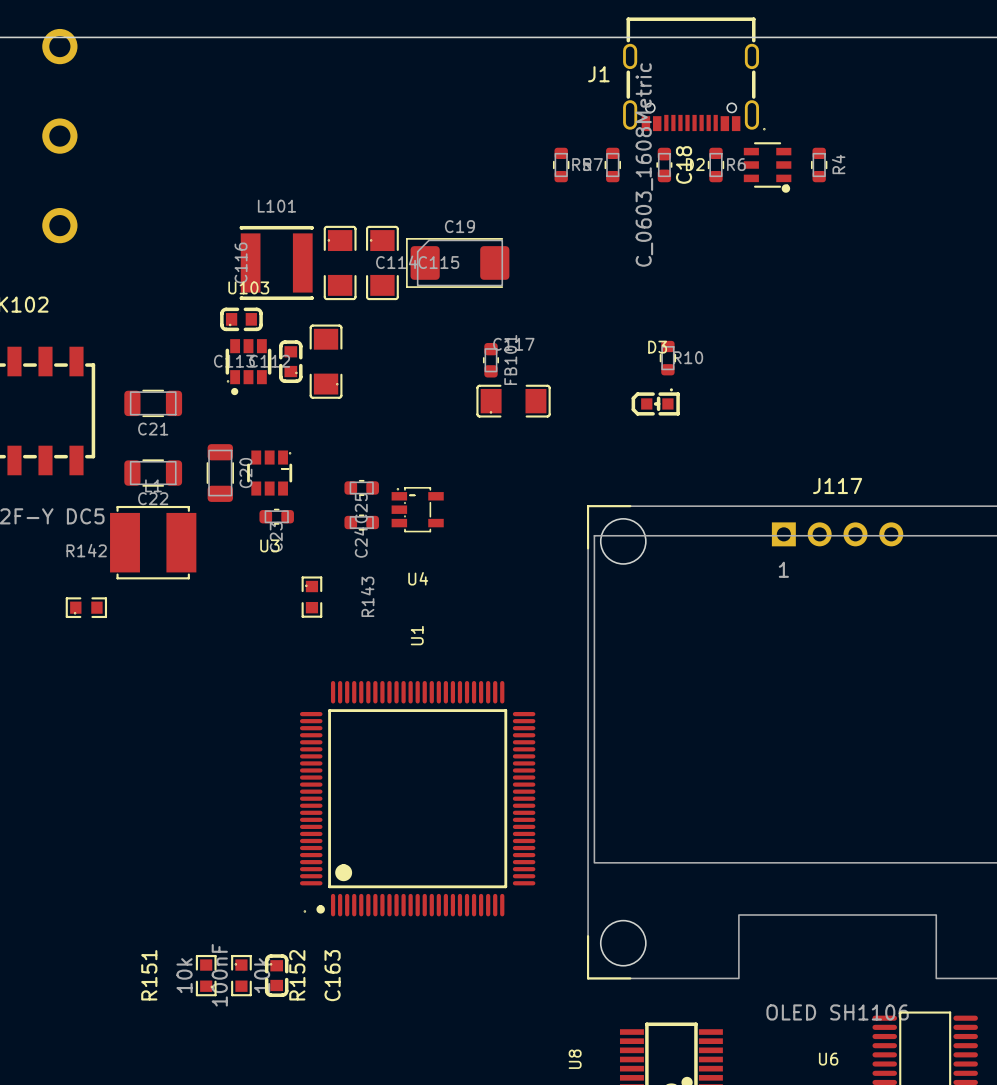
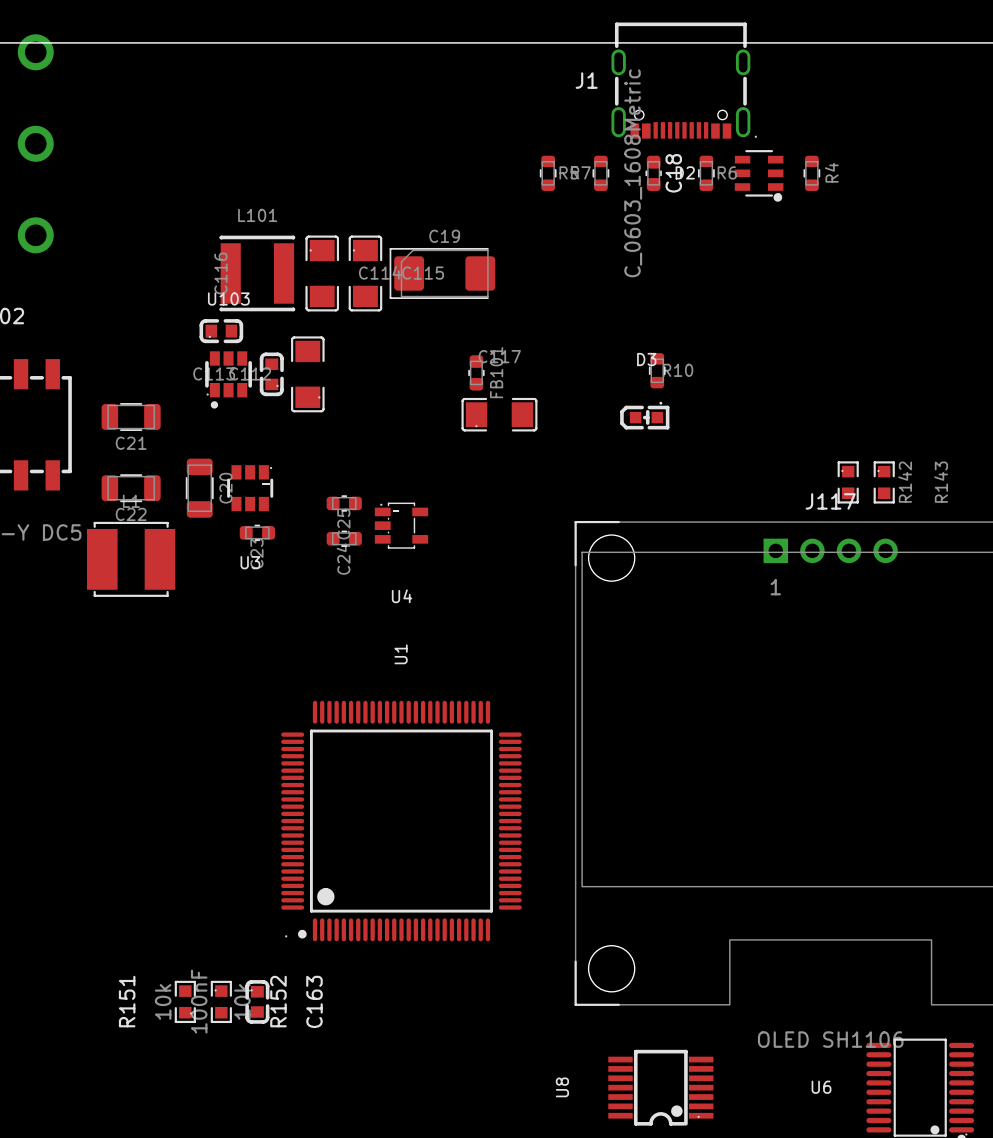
R143 position: (311, 597) -> (884, 482)
R142 rotation: 0° (86, 607) -> 90° clockwise (848, 482)
R142 position: (86, 607) -> (848, 482)

